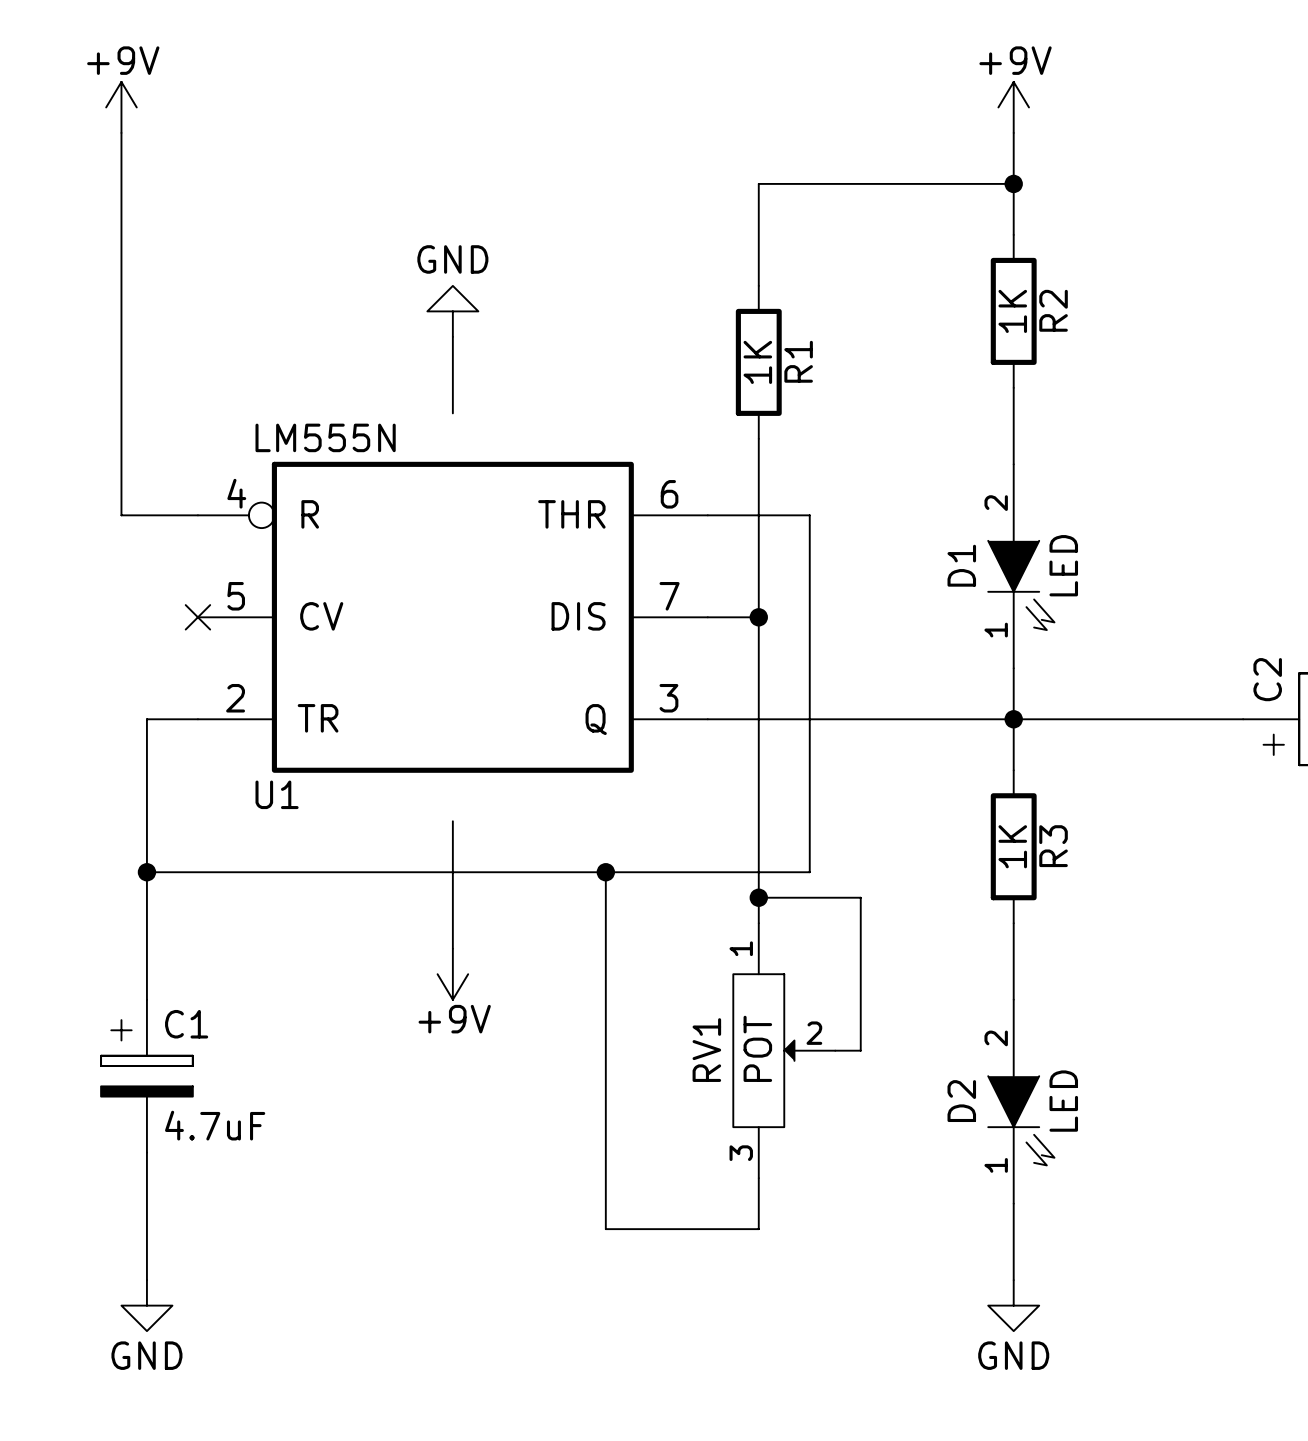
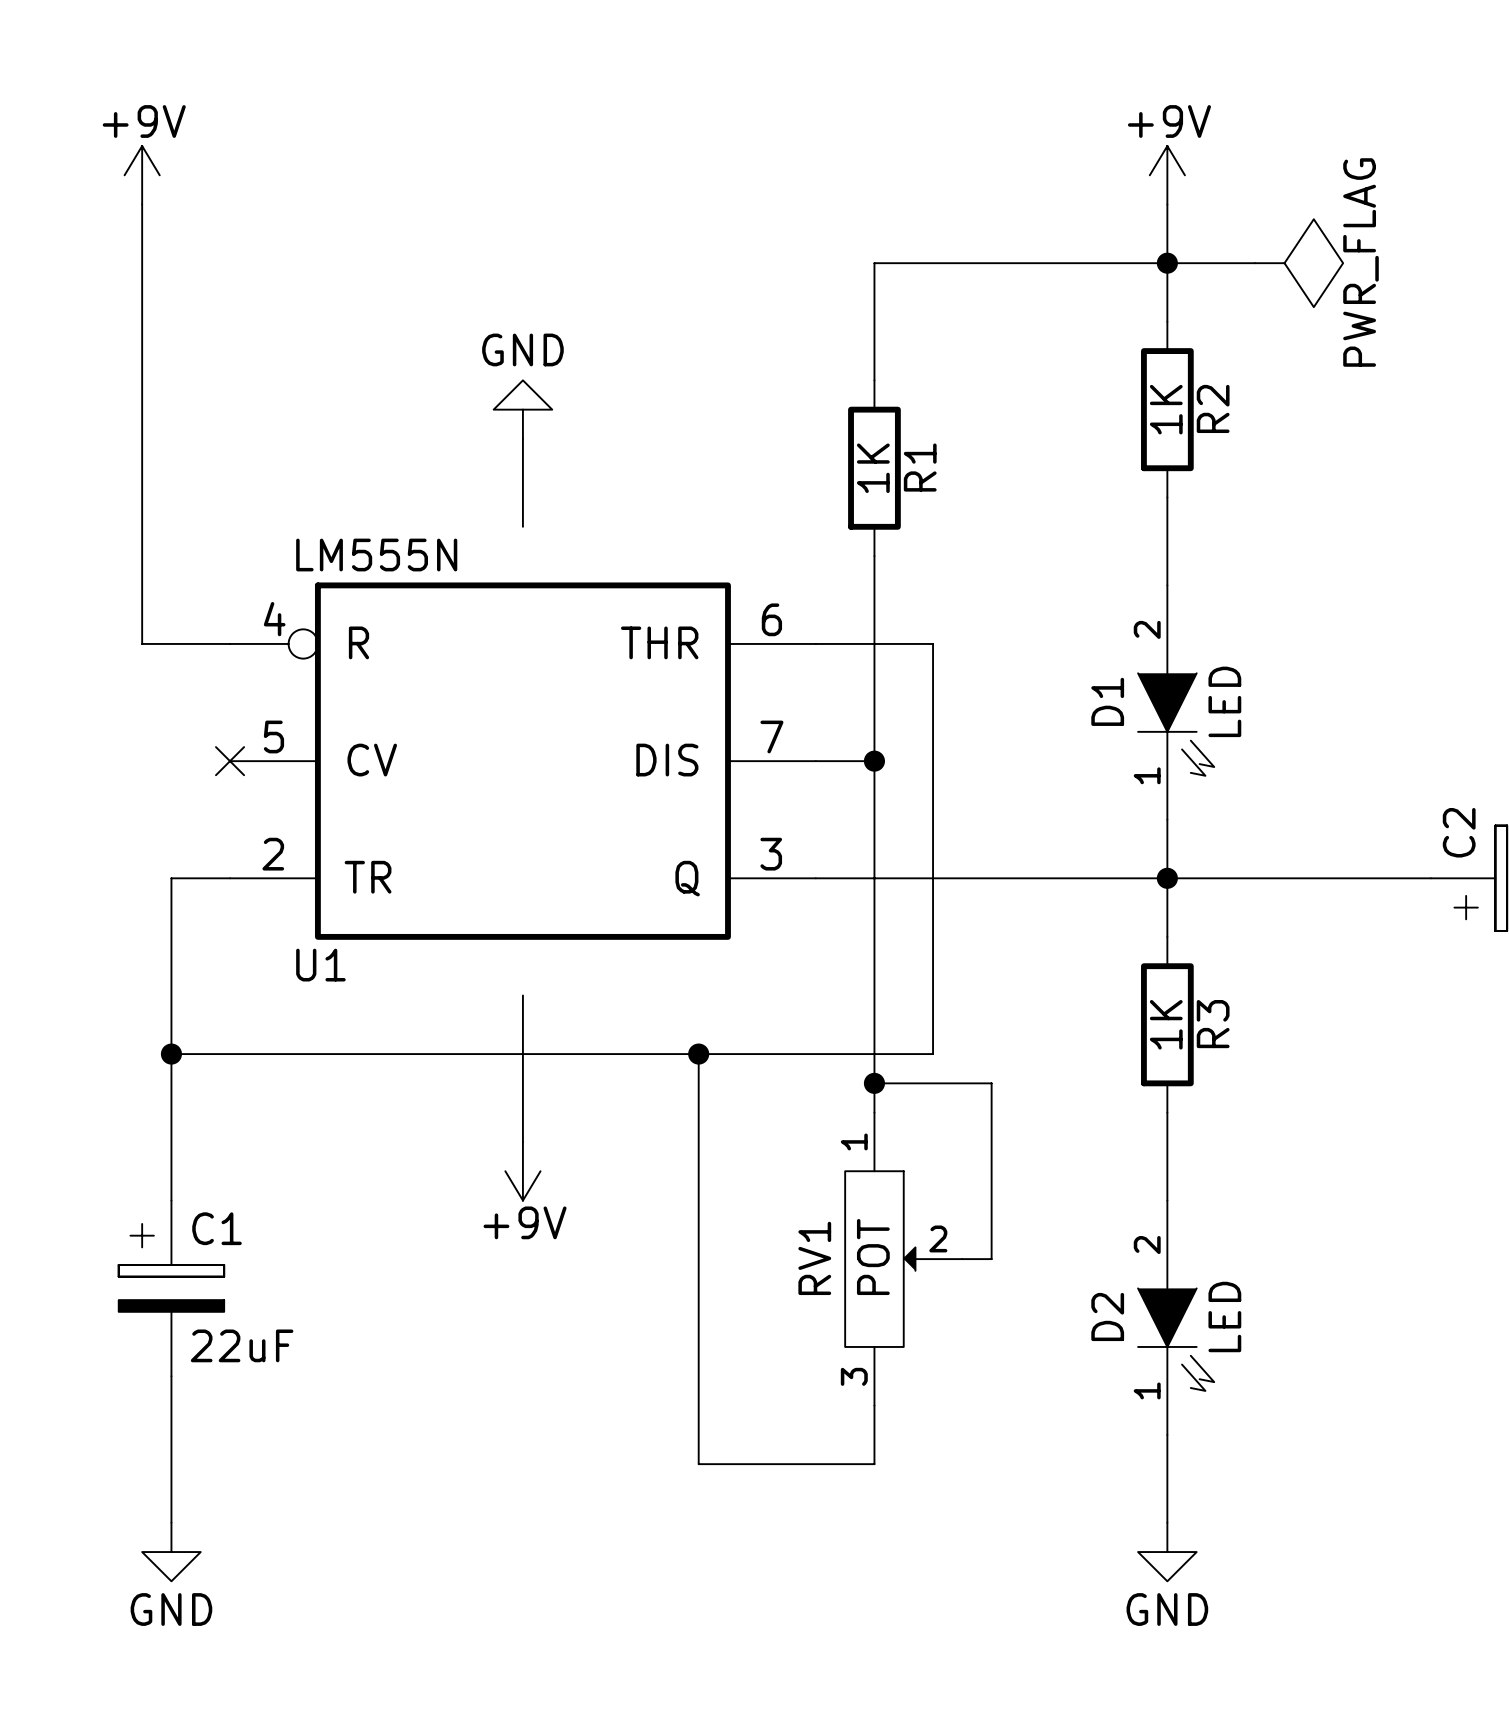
wire: none -> (1167, 263) (1255, 263)
power symbol: none -> PWR_FLAG (1299, 263)
C1 value: 4.7uF (215, 1125) -> 22uF (242, 1345)

